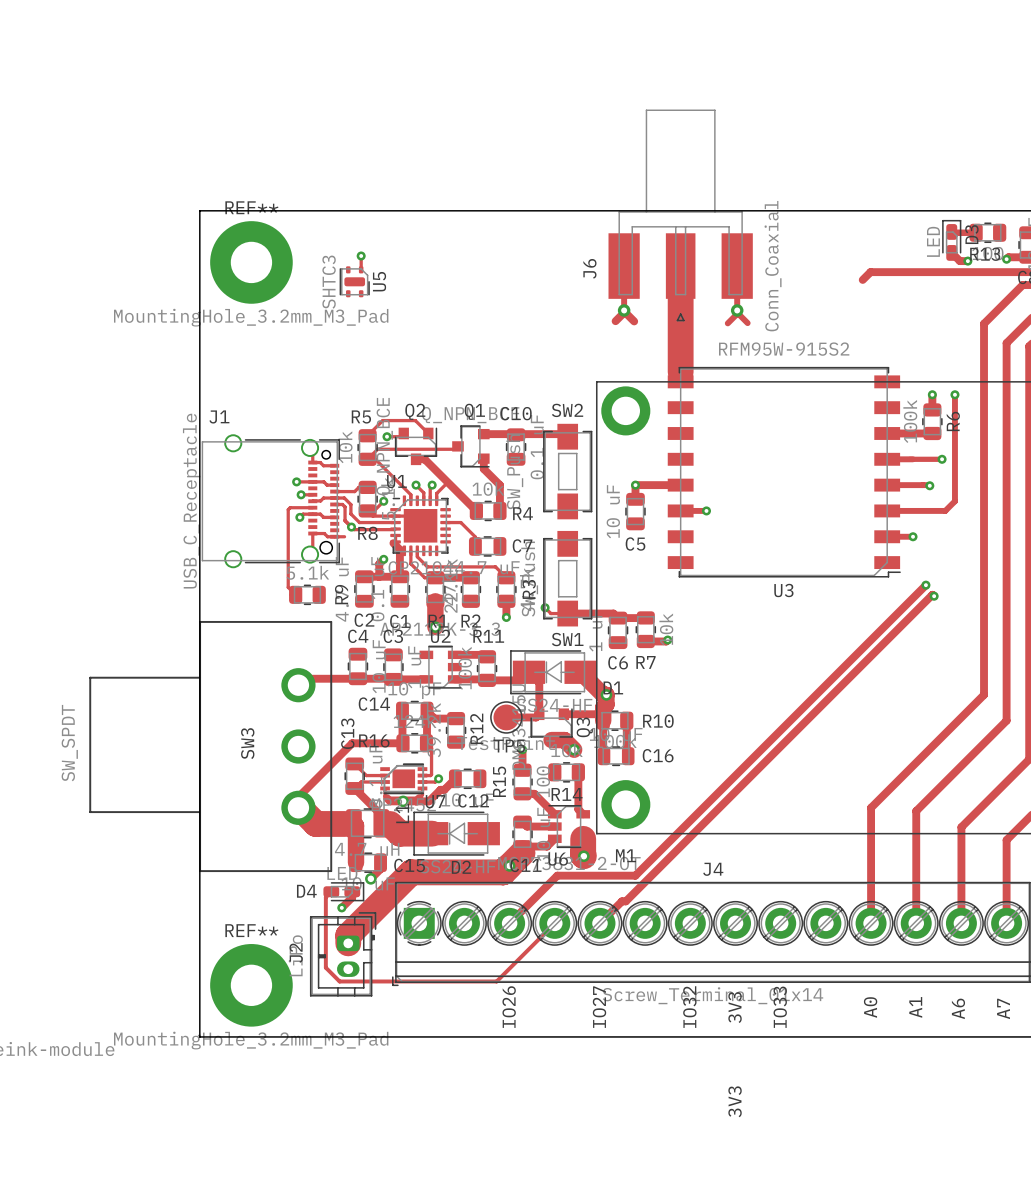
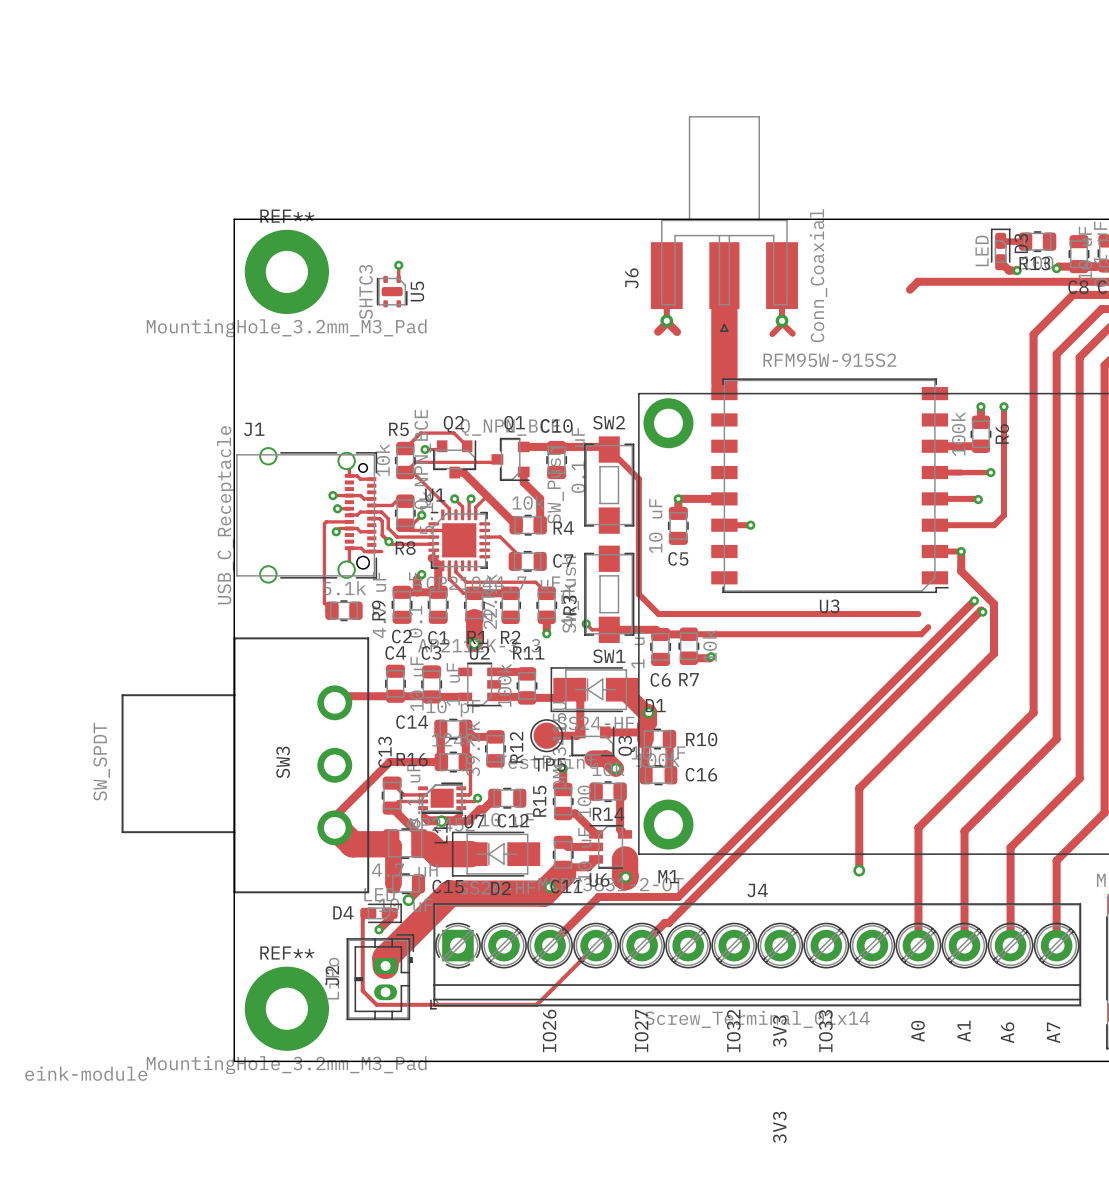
track: none -> (609, 449) (638, 479) (638, 594) (658, 614) (918, 614)
track: none -> (961, 551) (961, 571) (994, 604) (994, 653) (859, 788) (859, 870)
track: none -> (928, 627) (921, 634) (688, 634)
via: none -> (859, 870)

